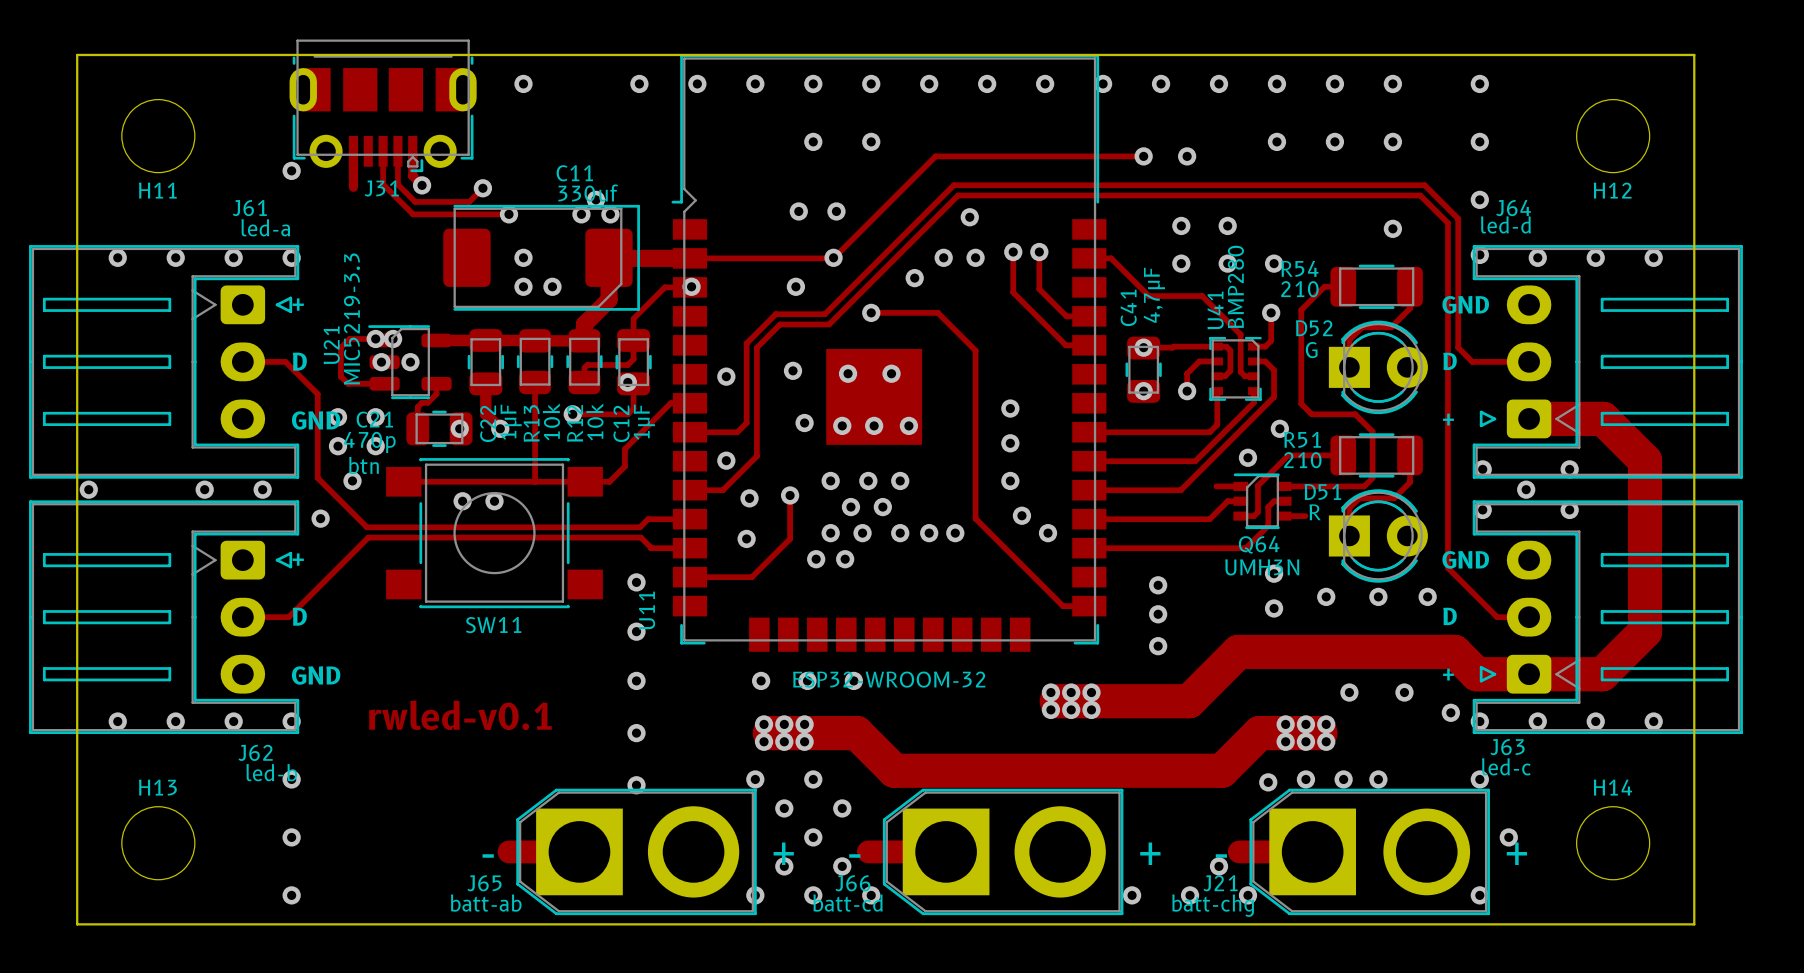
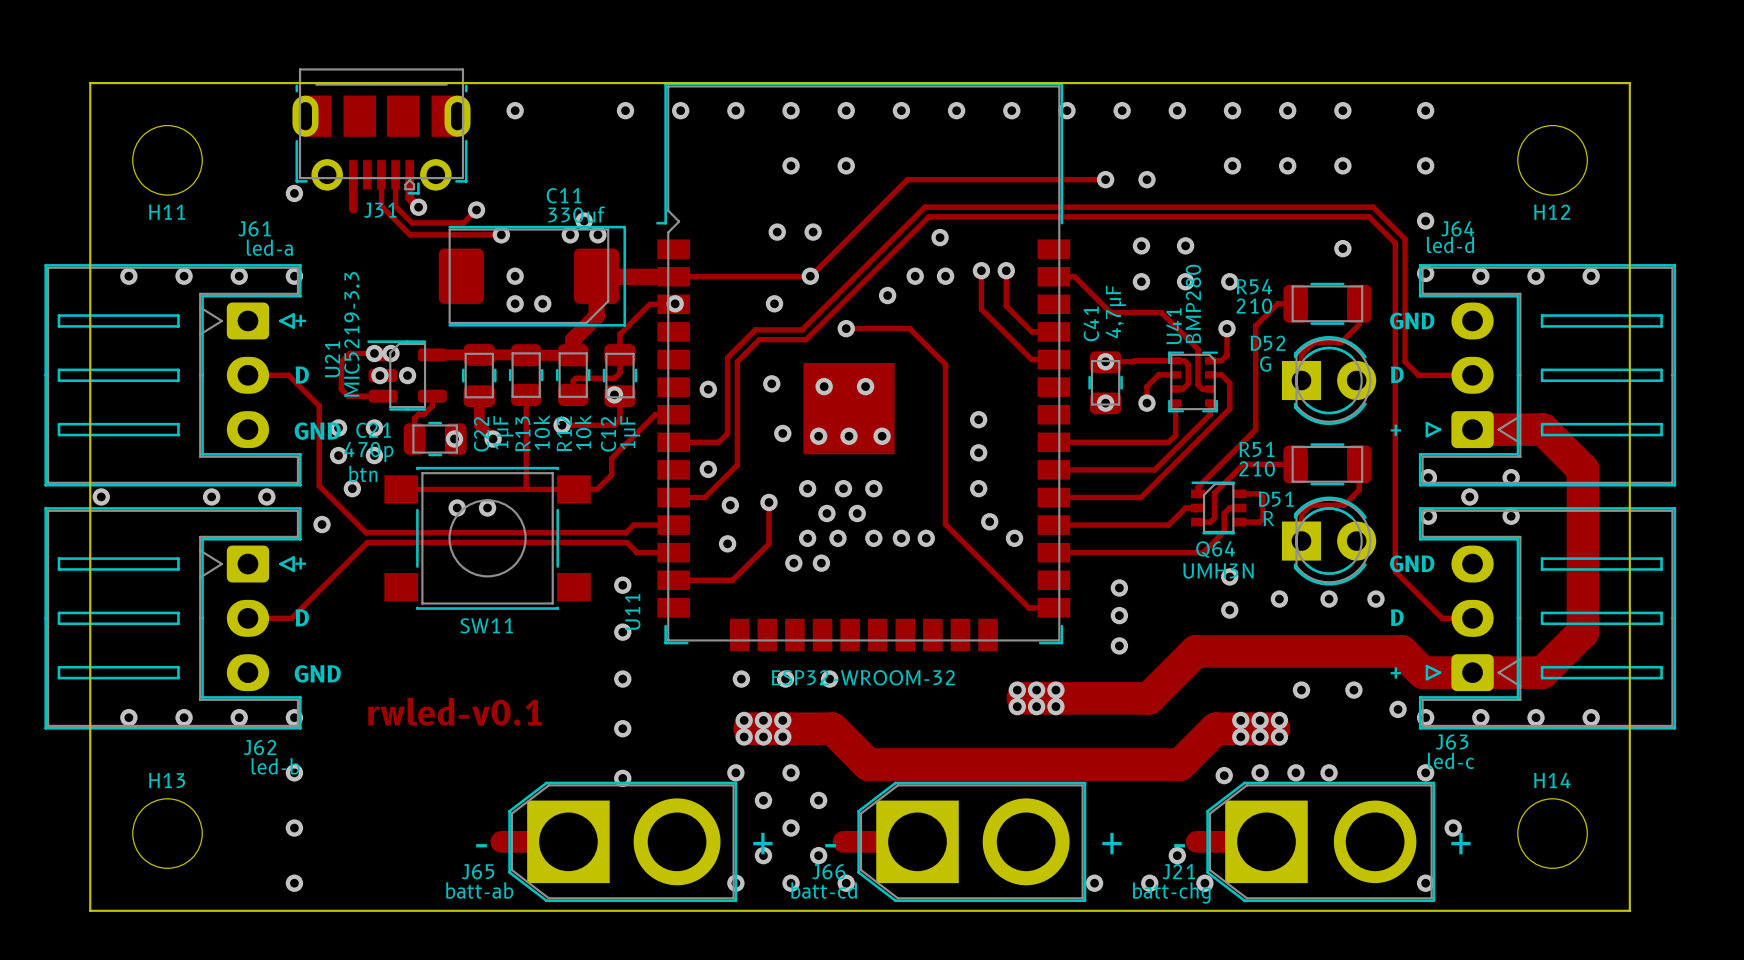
track: (1301, 403) (1311, 414) (1355, 414) (1372, 431) (1372, 478) (1364, 486) (1305, 486) -> (1255, 415) (1255, 429) (1198, 487) (1198, 493)
via: (1279, 428) -> none
via: (1247, 457) -> none
track: (1216, 486) (1240, 486) -> none
track: none -> (1259, 493) (1262, 496) (1262, 519) (1259, 522)

